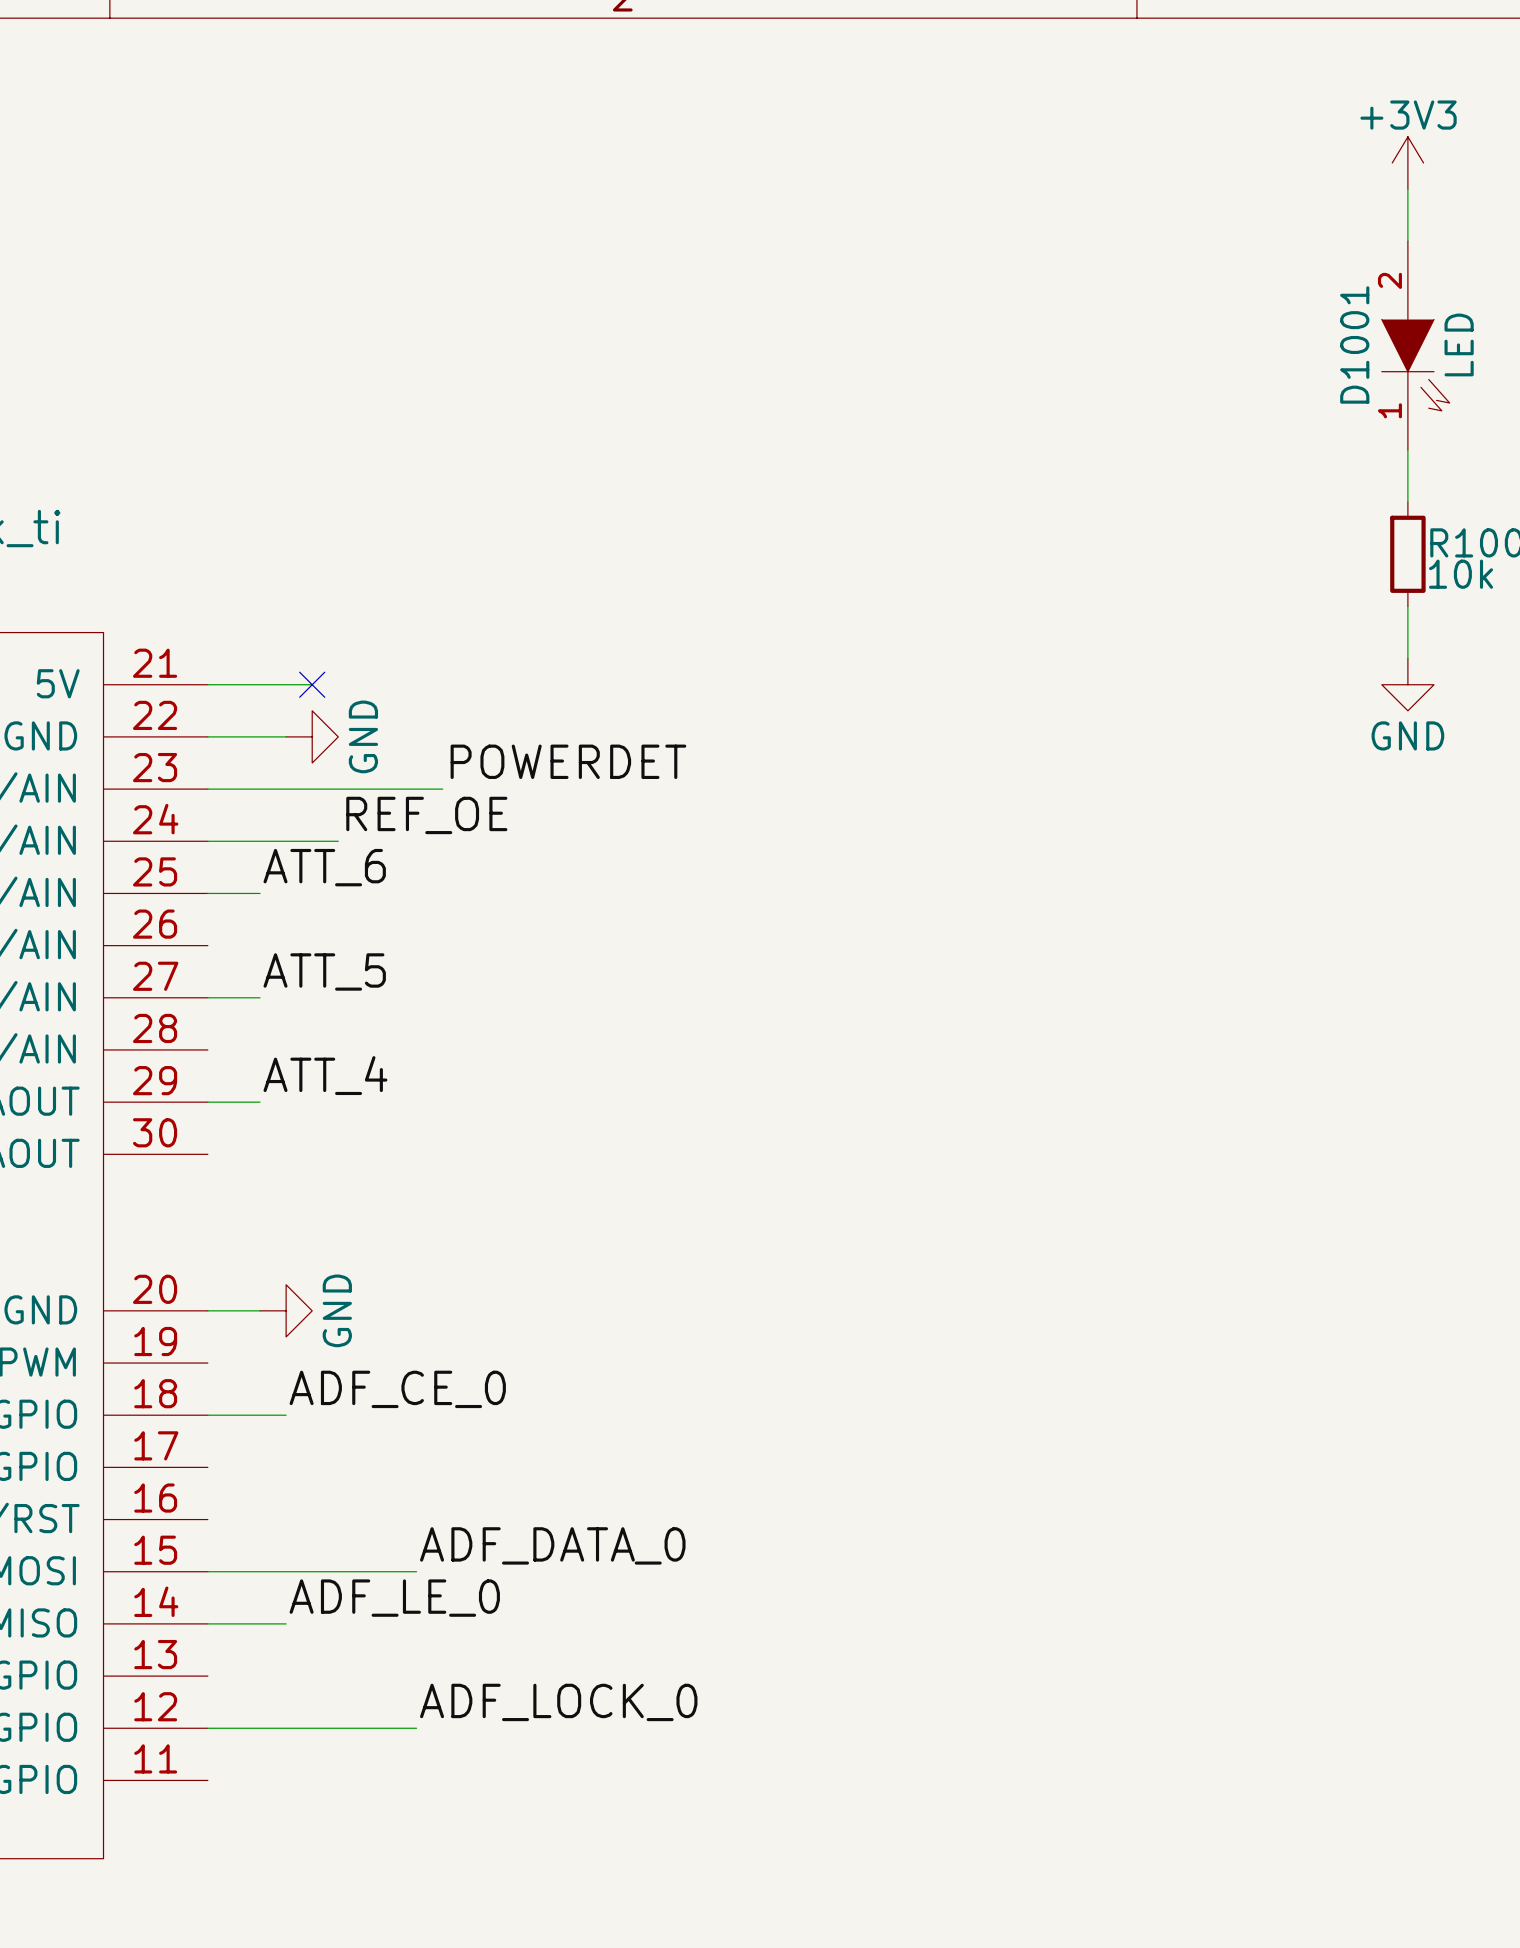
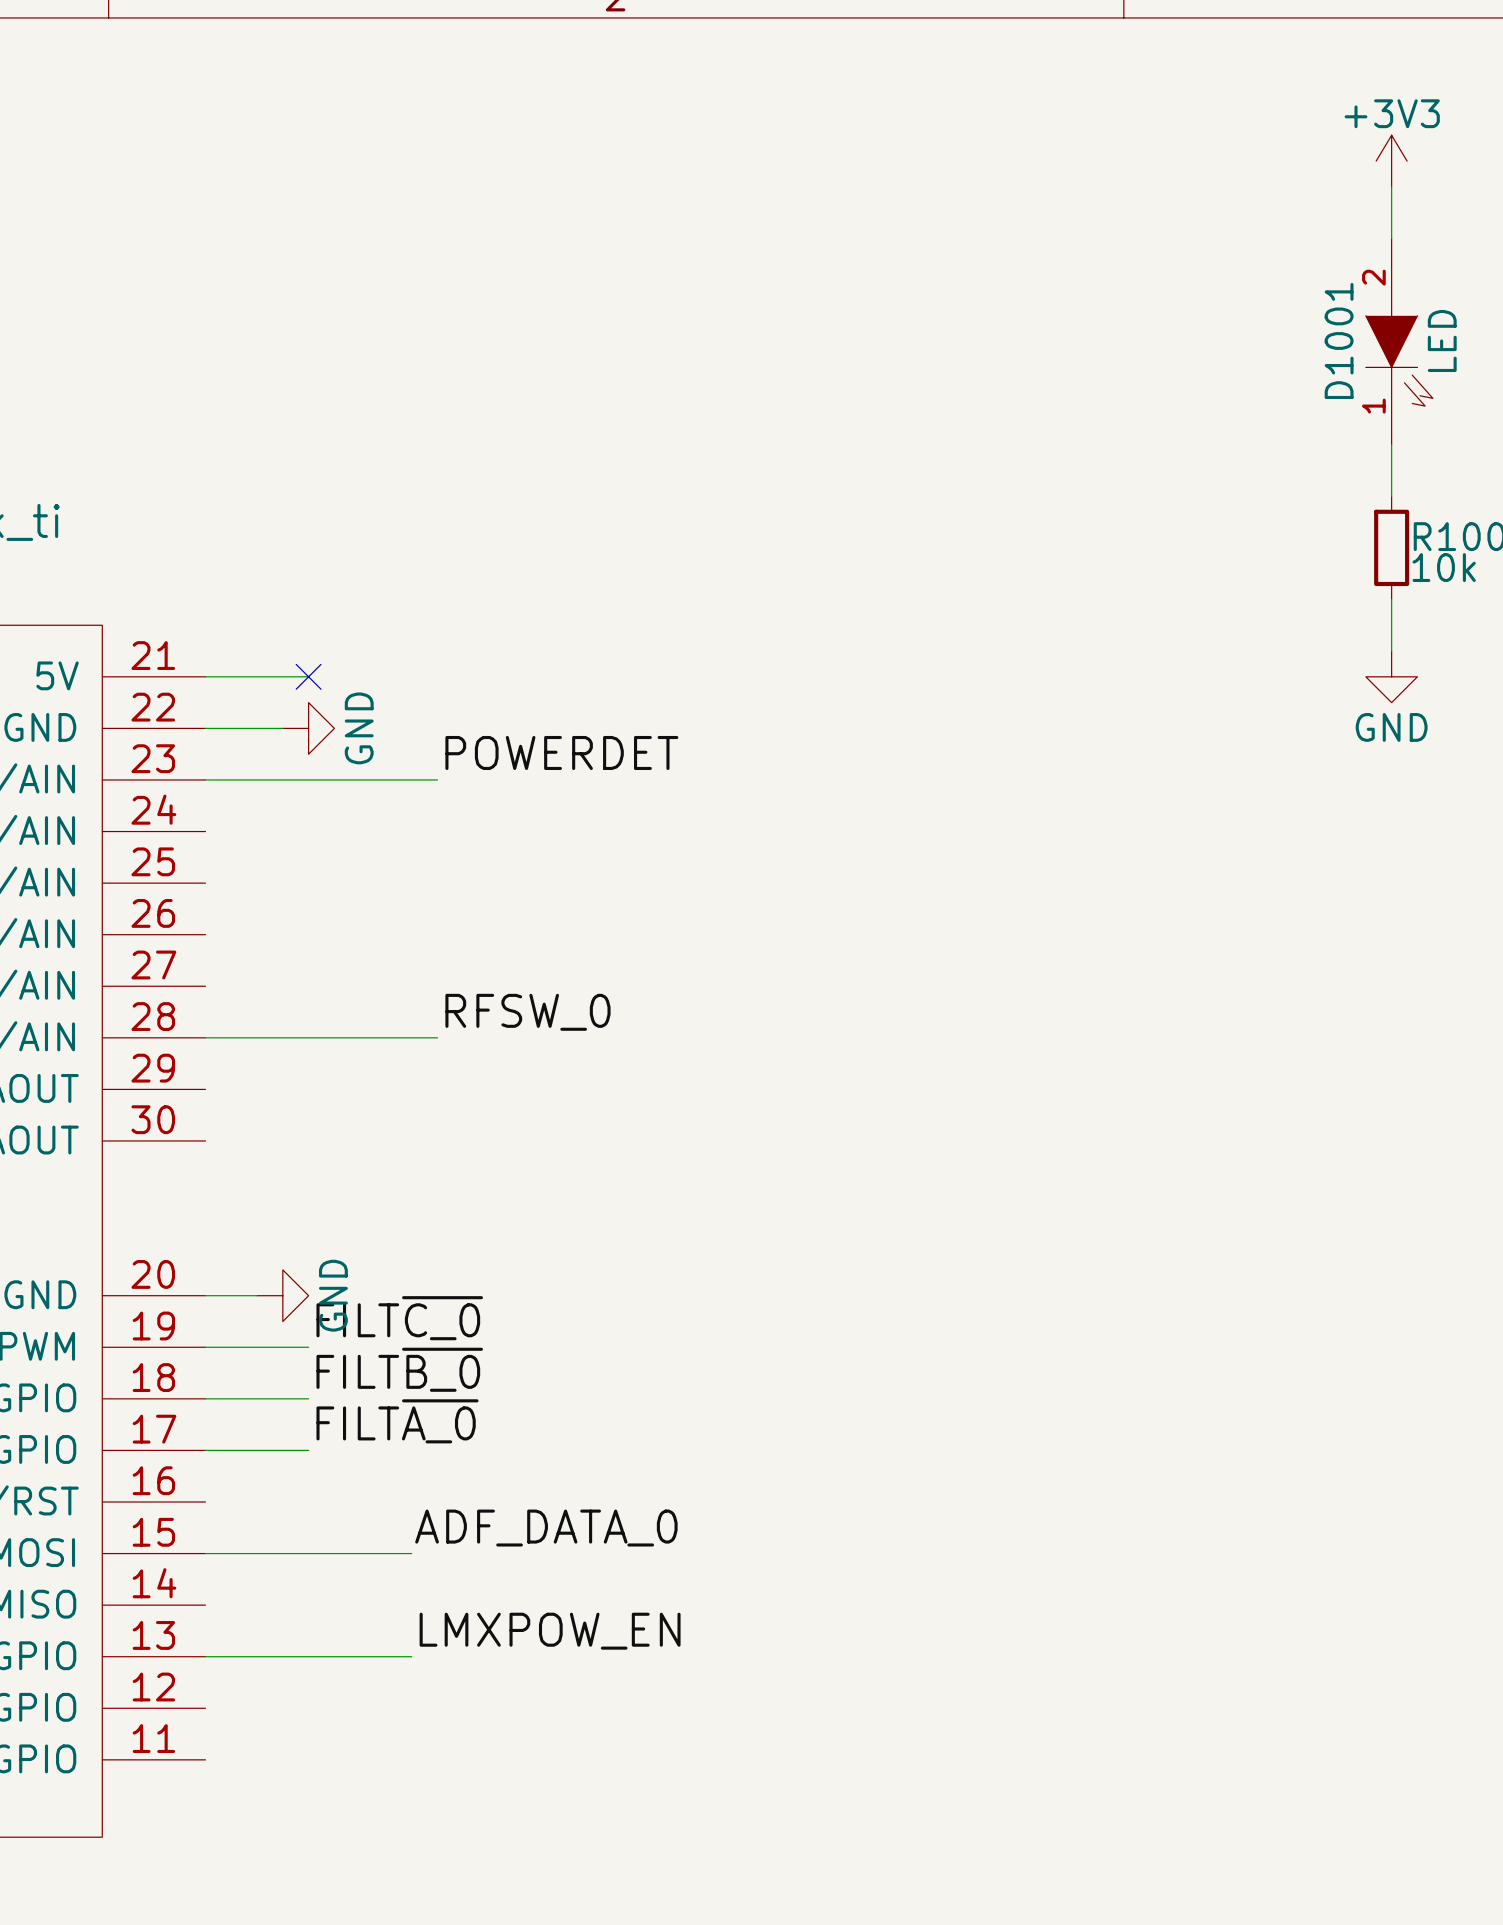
label: REF_OE (426, 815) -> none
wire: (207, 841) (338, 841) -> none
label: ATT_6 (324, 867) -> none
wire: (207, 893) (260, 893) -> none
label: ATT_5 (324, 971) -> none
wire: (207, 997) (260, 997) -> none
label: none -> RFSW_0 (527, 1012)
wire: none -> (205, 1037) (437, 1037)
label: ATT_4 (325, 1075) -> none
wire: (207, 1102) (260, 1102) -> none
label: none -> FILT~{C_0} (399, 1318)
wire: none -> (205, 1347) (308, 1347)
label: none -> FILT~{B_0} (399, 1369)
label: ADF_CE_0 (397, 1389) -> none
wire: none -> (282, 1398) (308, 1398)
label: none -> FILT~{A_0} (397, 1421)
wire: none -> (205, 1450) (308, 1450)
label: ADF_LE_0 (394, 1598) -> none
wire: (207, 1623) (286, 1623) -> none
label: none -> LMXPOW_EN (550, 1631)
label: ADF_LOCK_0 (558, 1702) -> none
wire: (207, 1728) (416, 1728) -> (205, 1656) (411, 1656)

